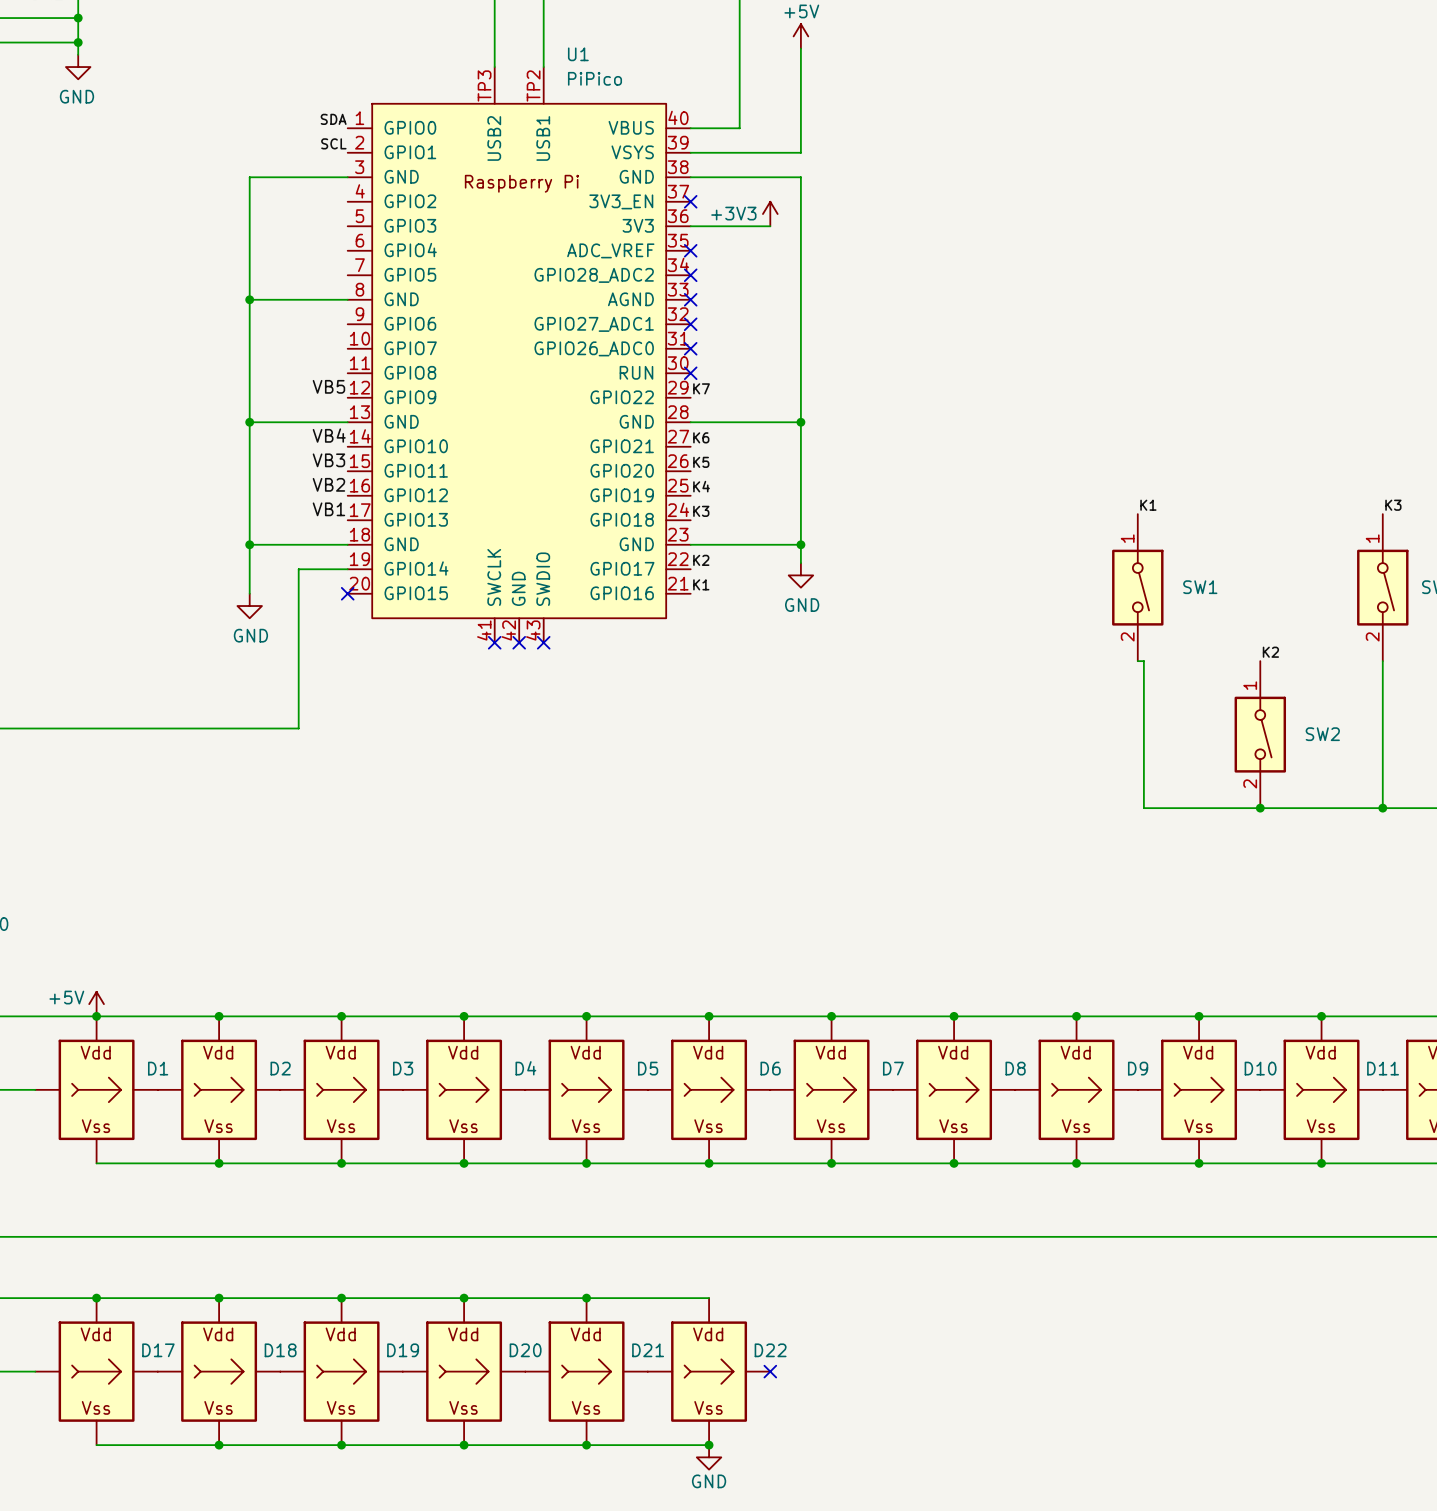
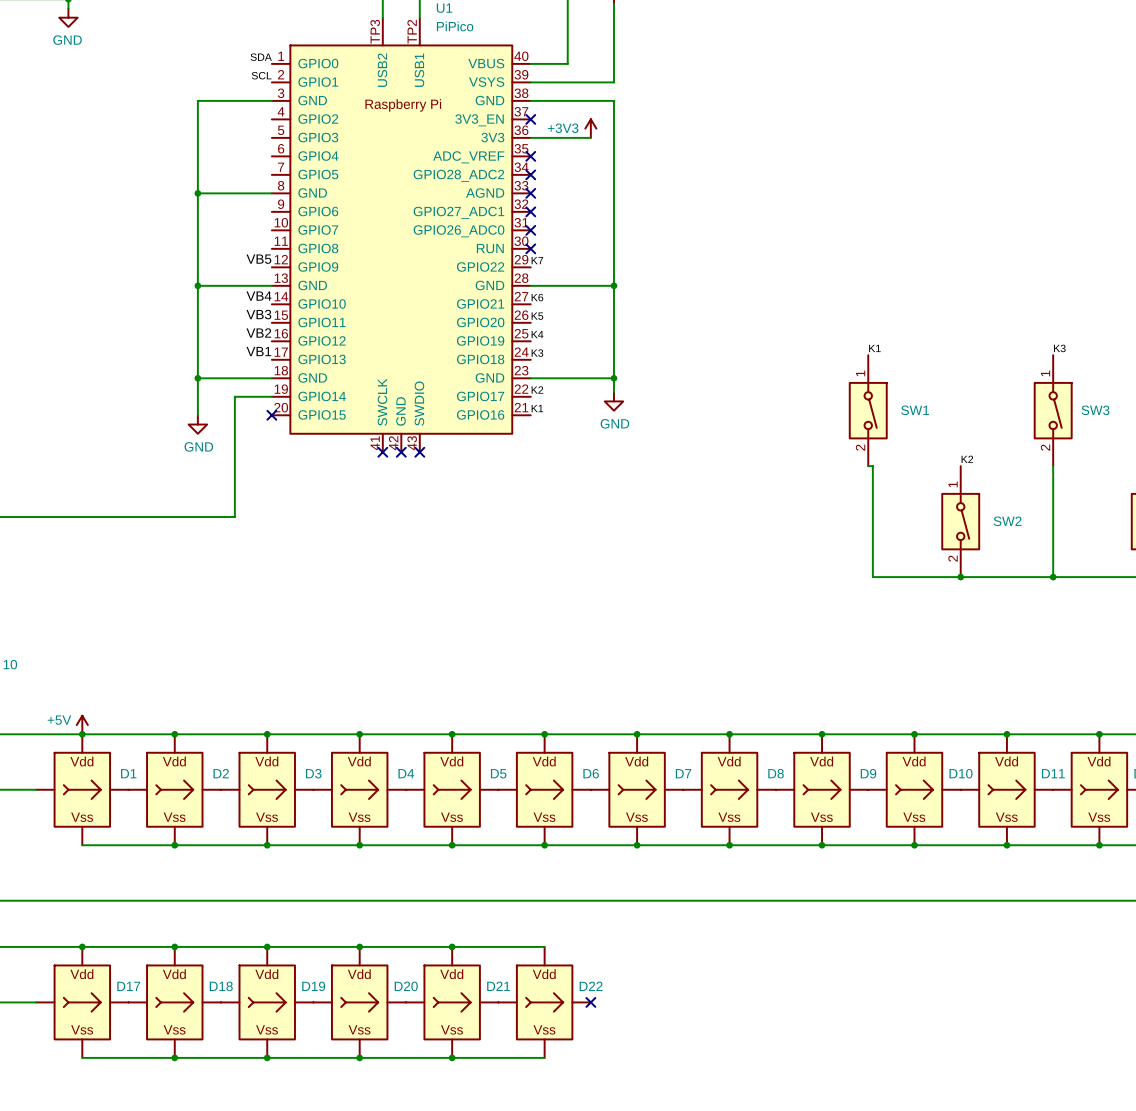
junction: (709, 1445) -> none
power symbol: GND (709, 1457) -> none

